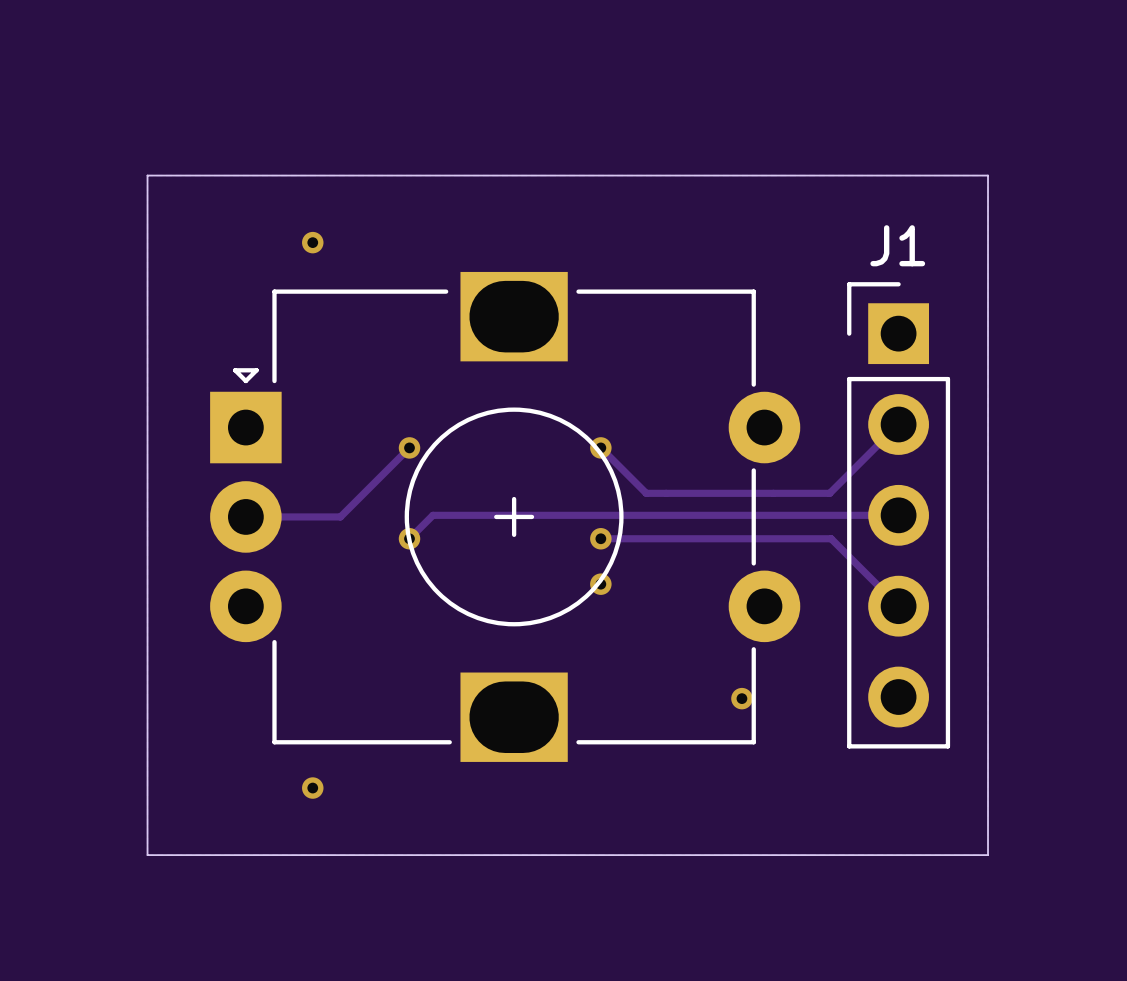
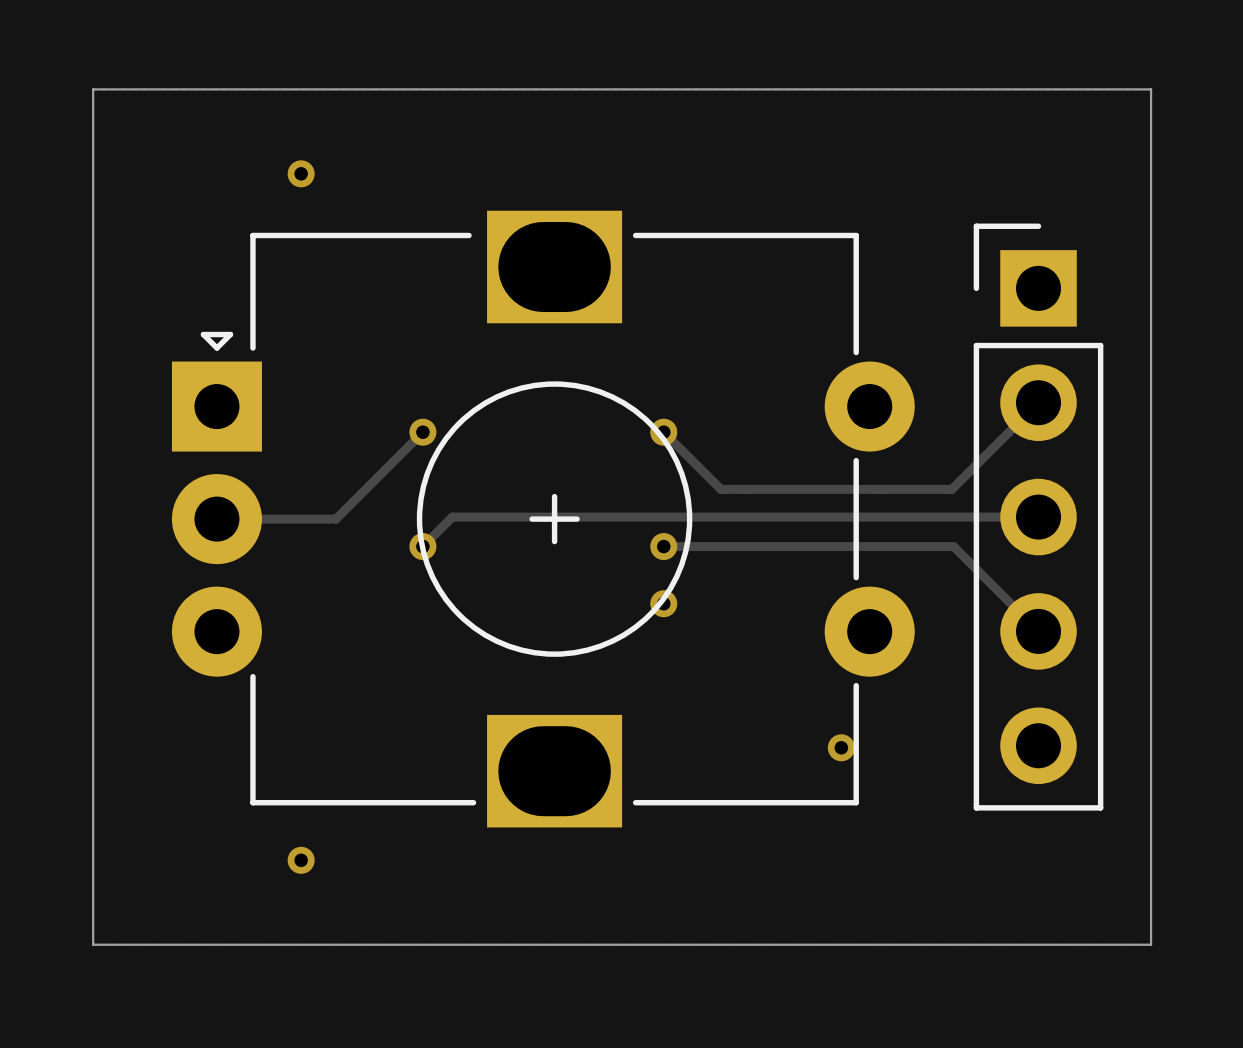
J1 name: J1 (897, 245) -> none

